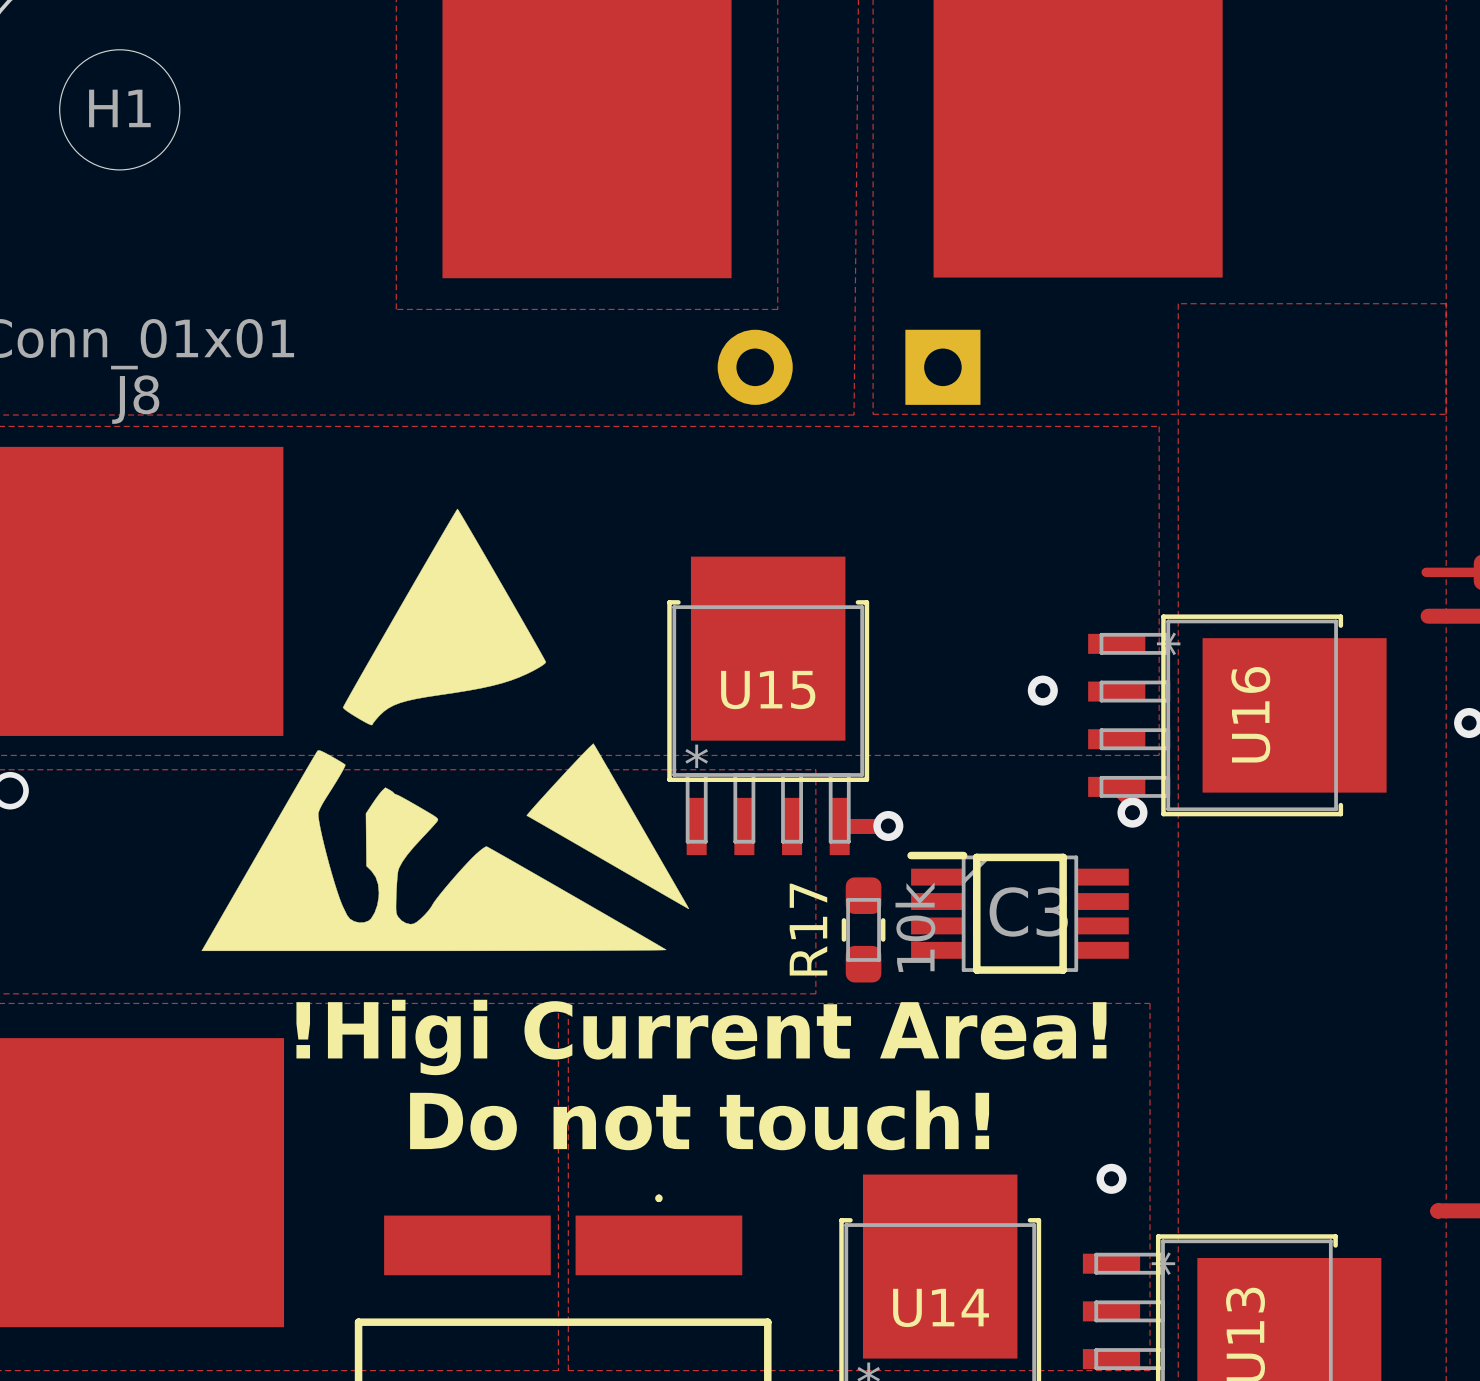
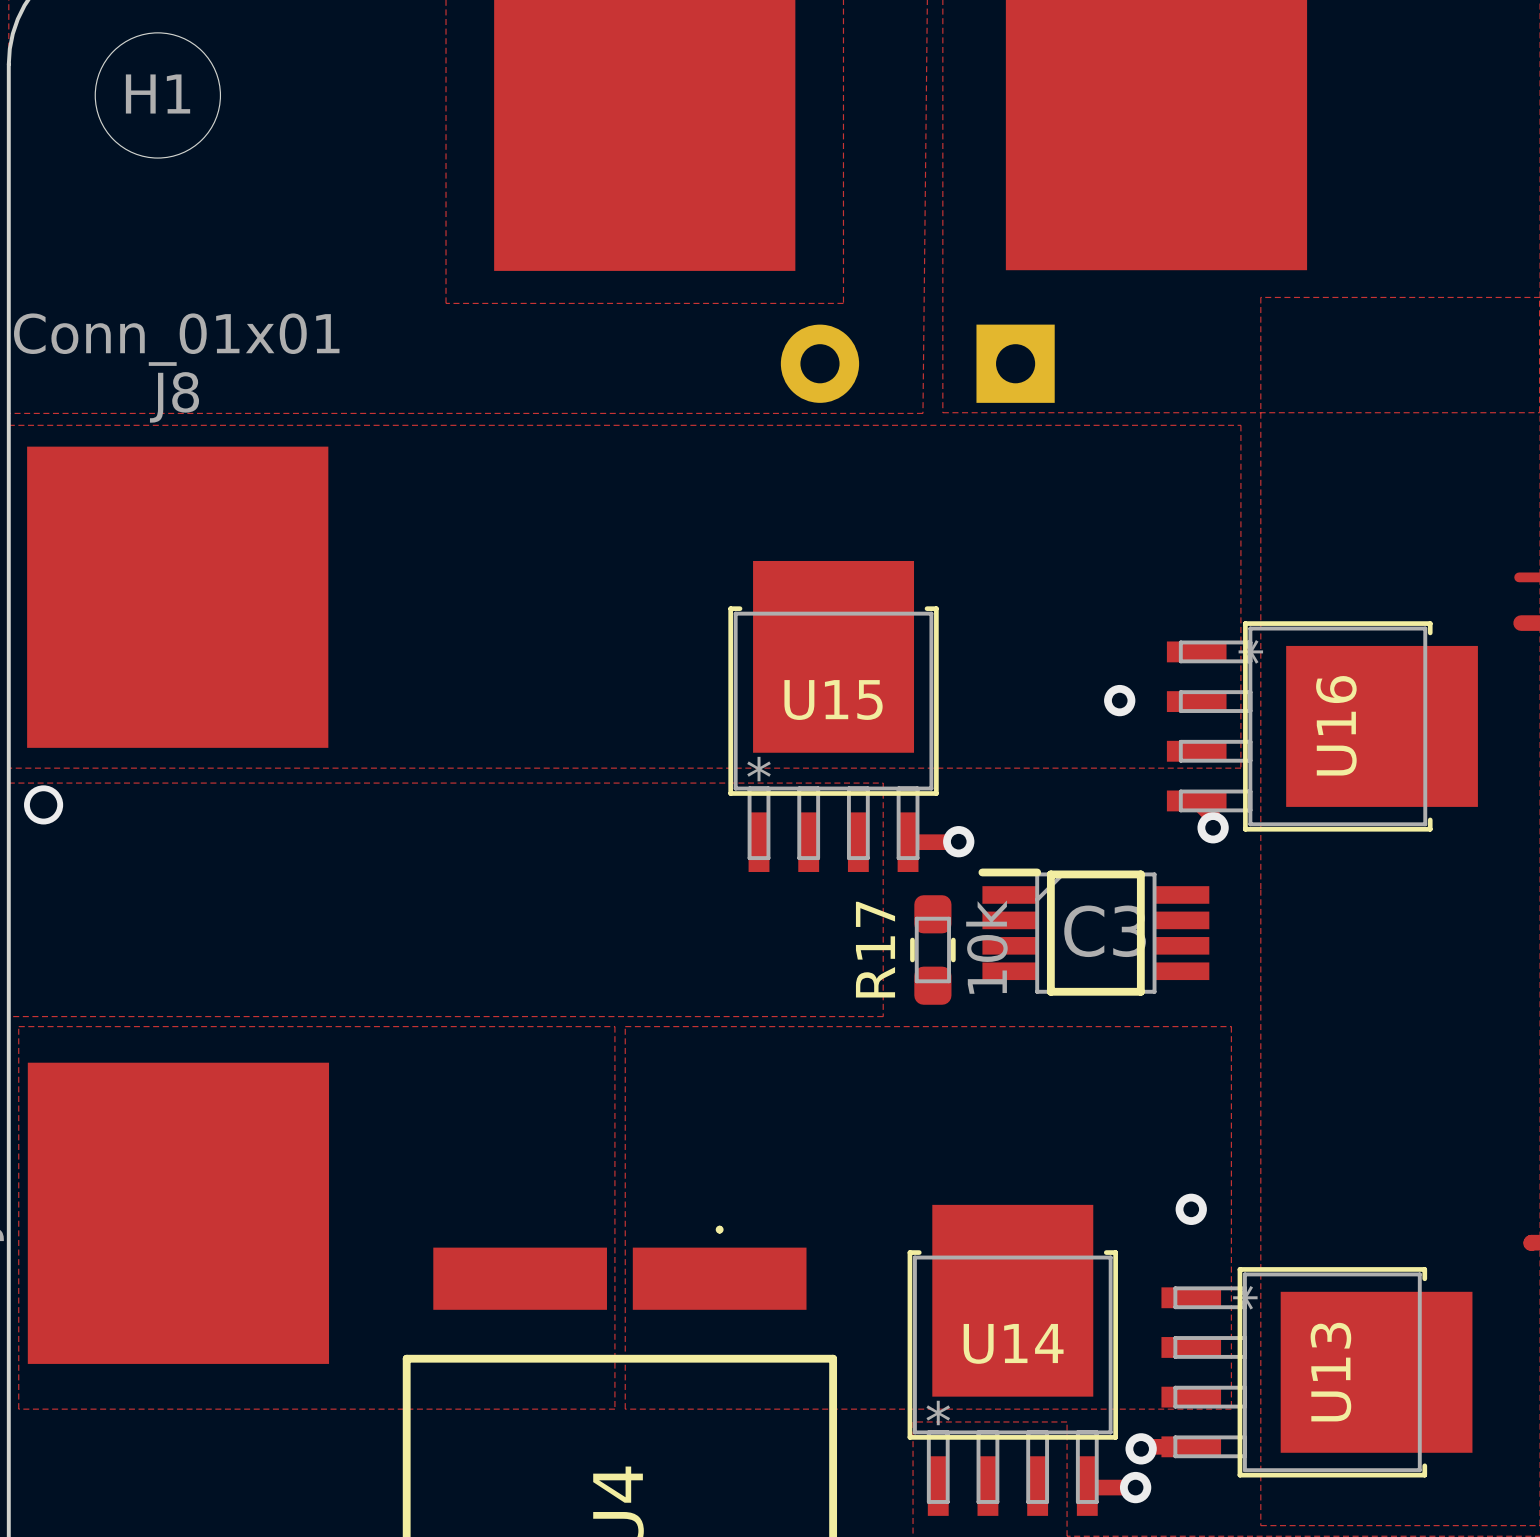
drawing: [201, 508, 689, 952] -> none
text: !Higi Current Area! (701, 1037) -> none
text: Do not touch! (699, 1120) -> none

